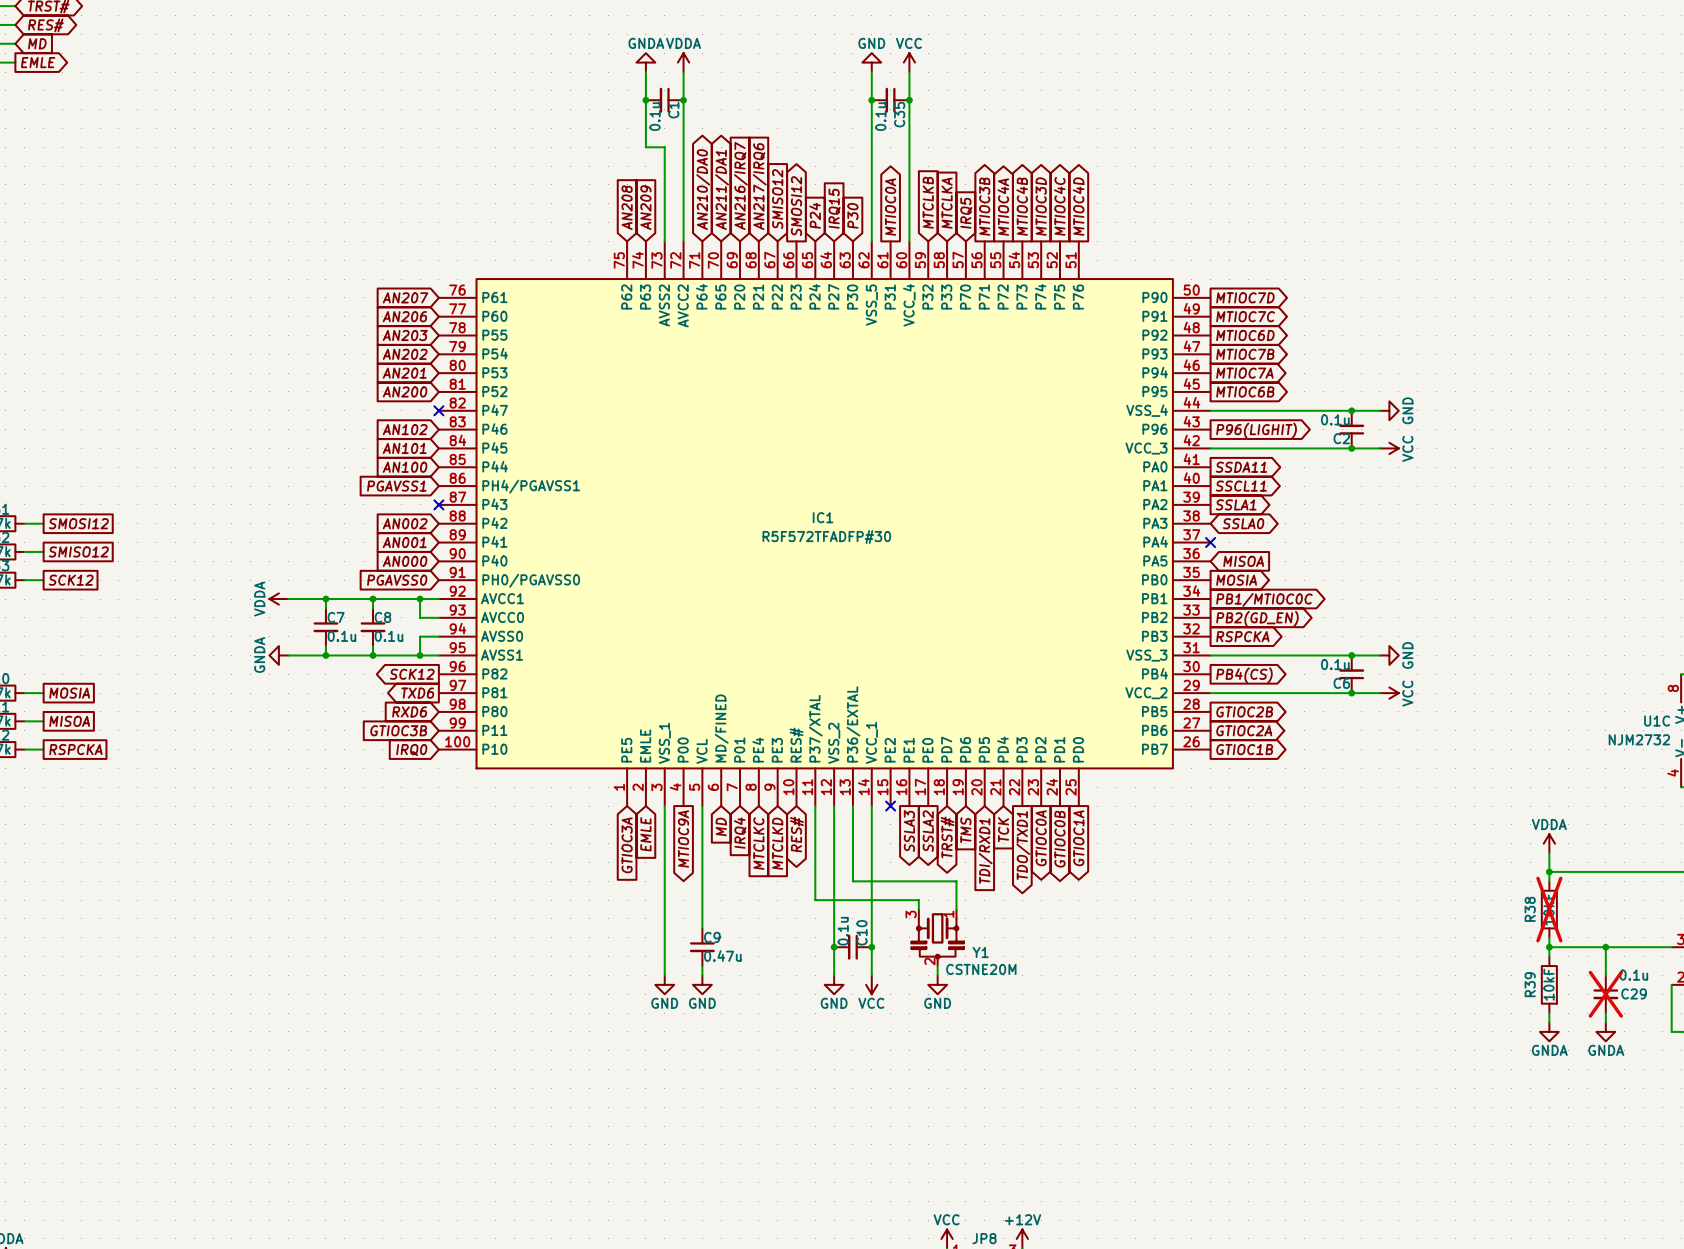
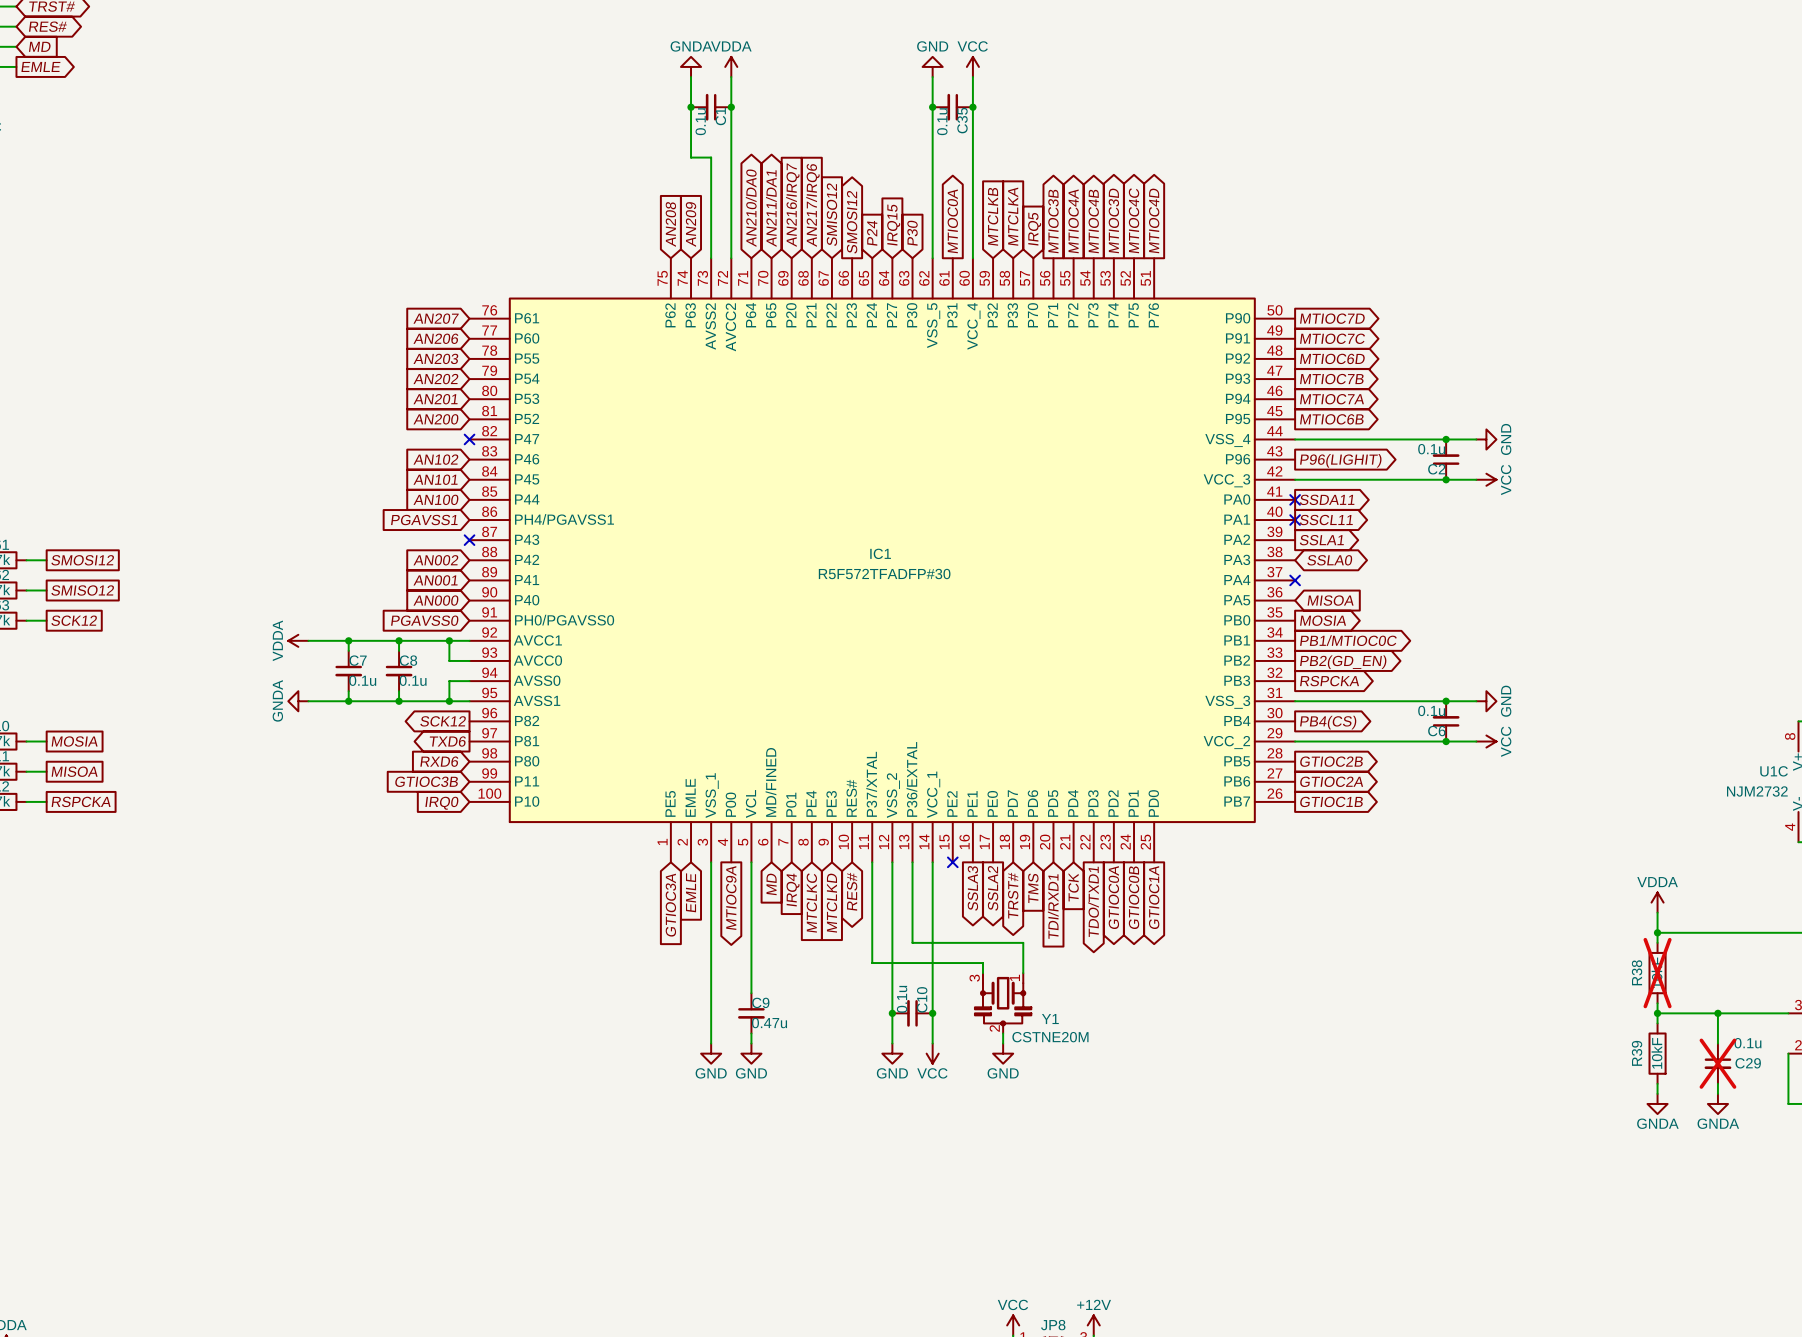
no-connect mark: none -> (1295, 499)
no-connect mark: none -> (1295, 520)

